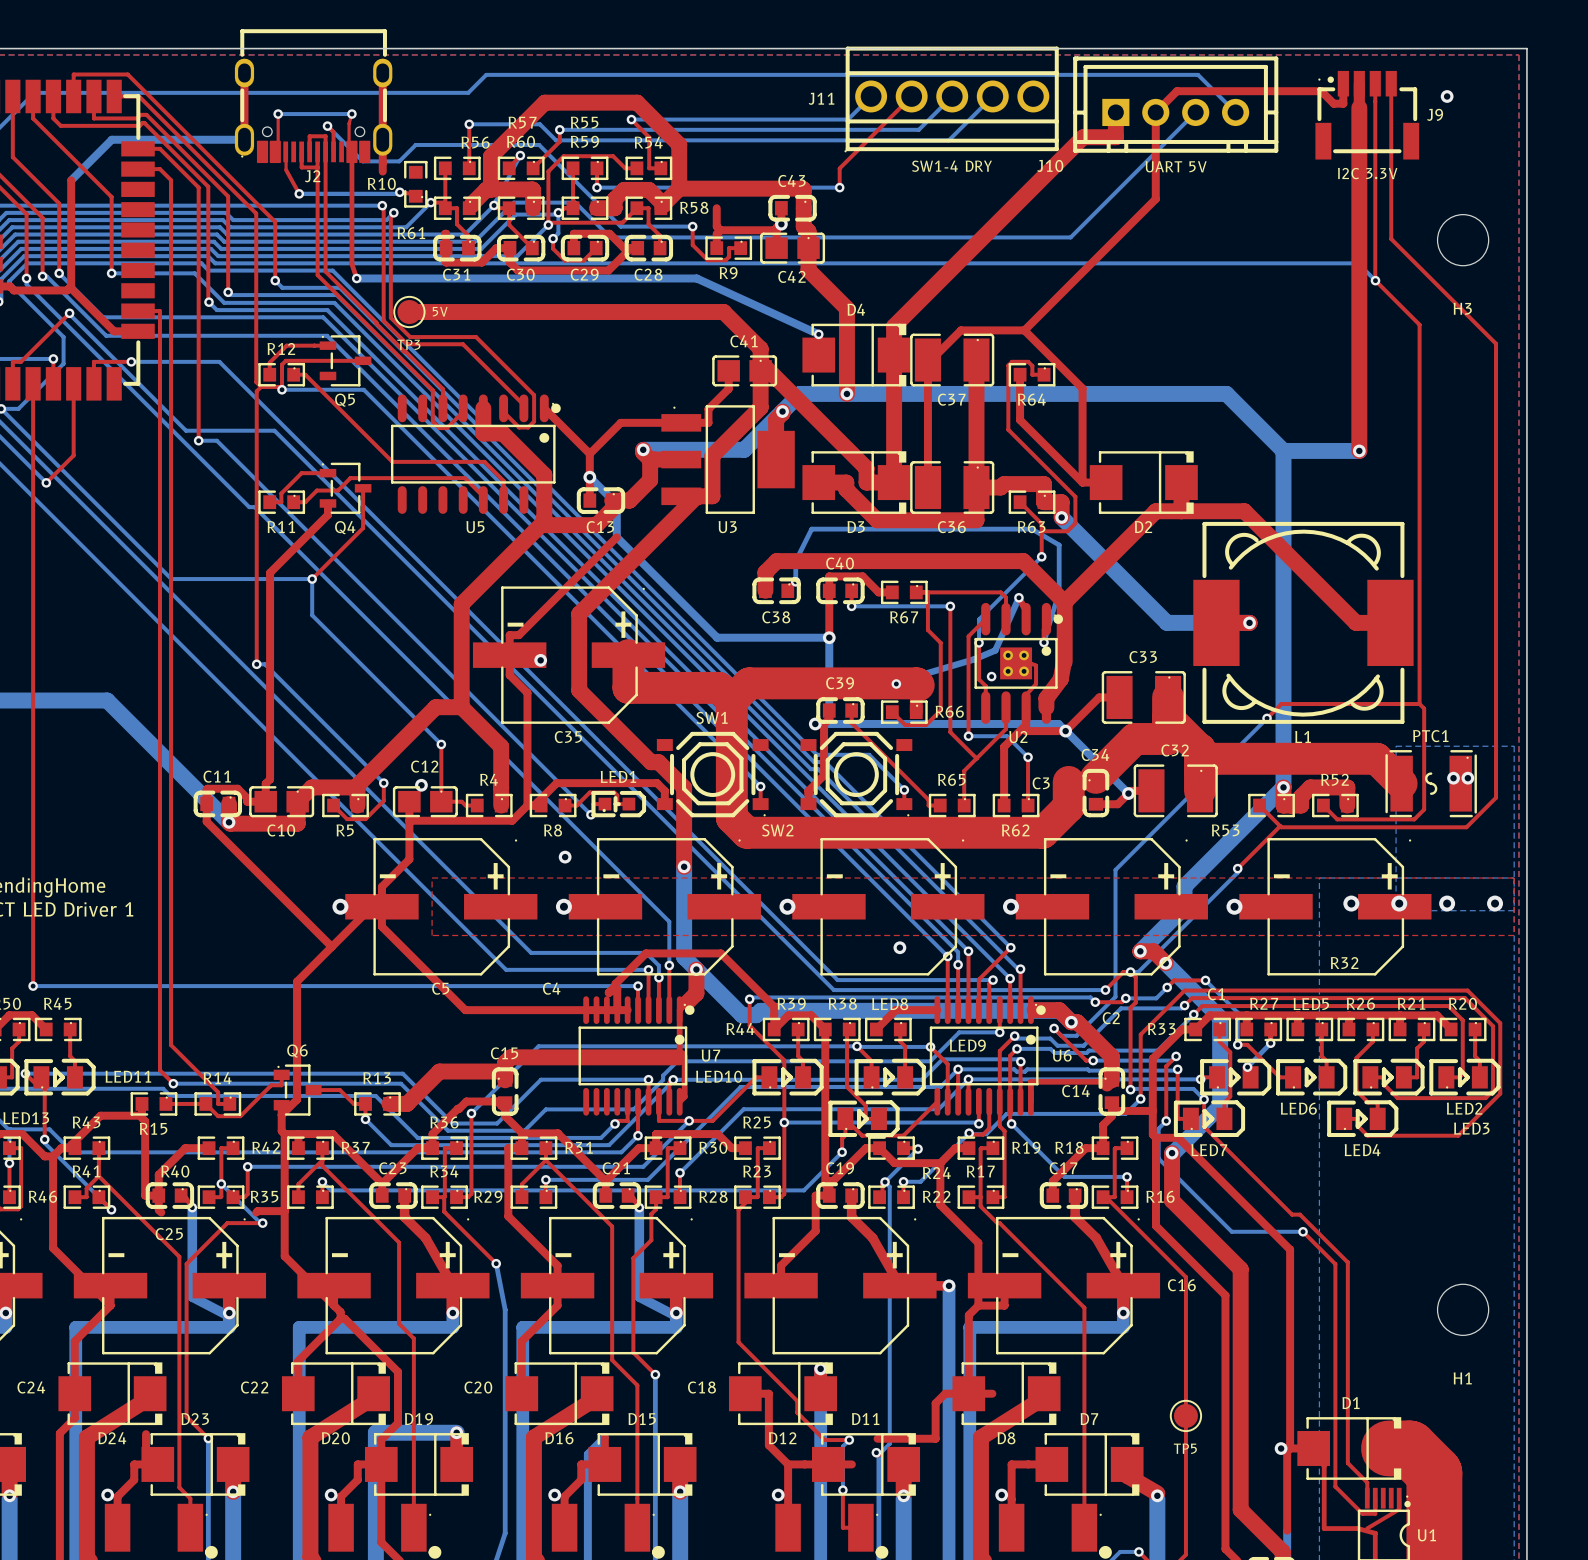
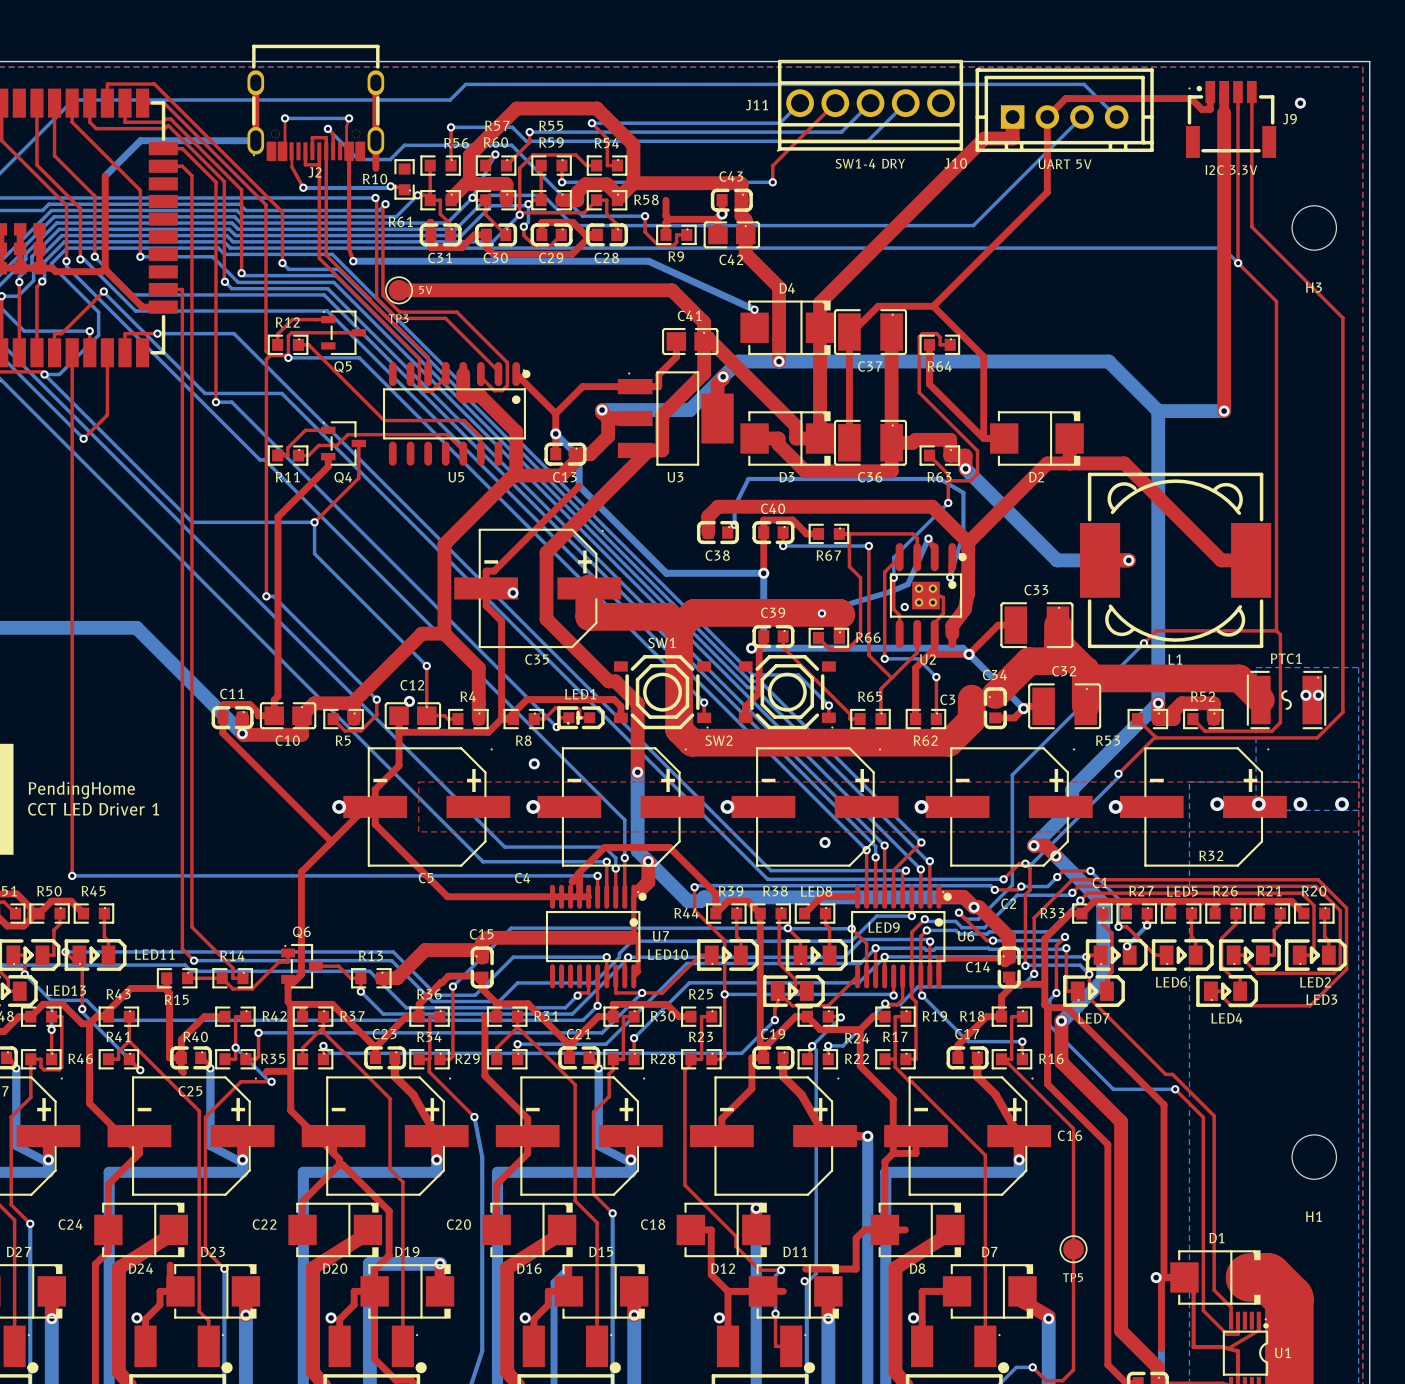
J2 footprint: [234, 29, 393, 164] -> [247, 44, 385, 161]

